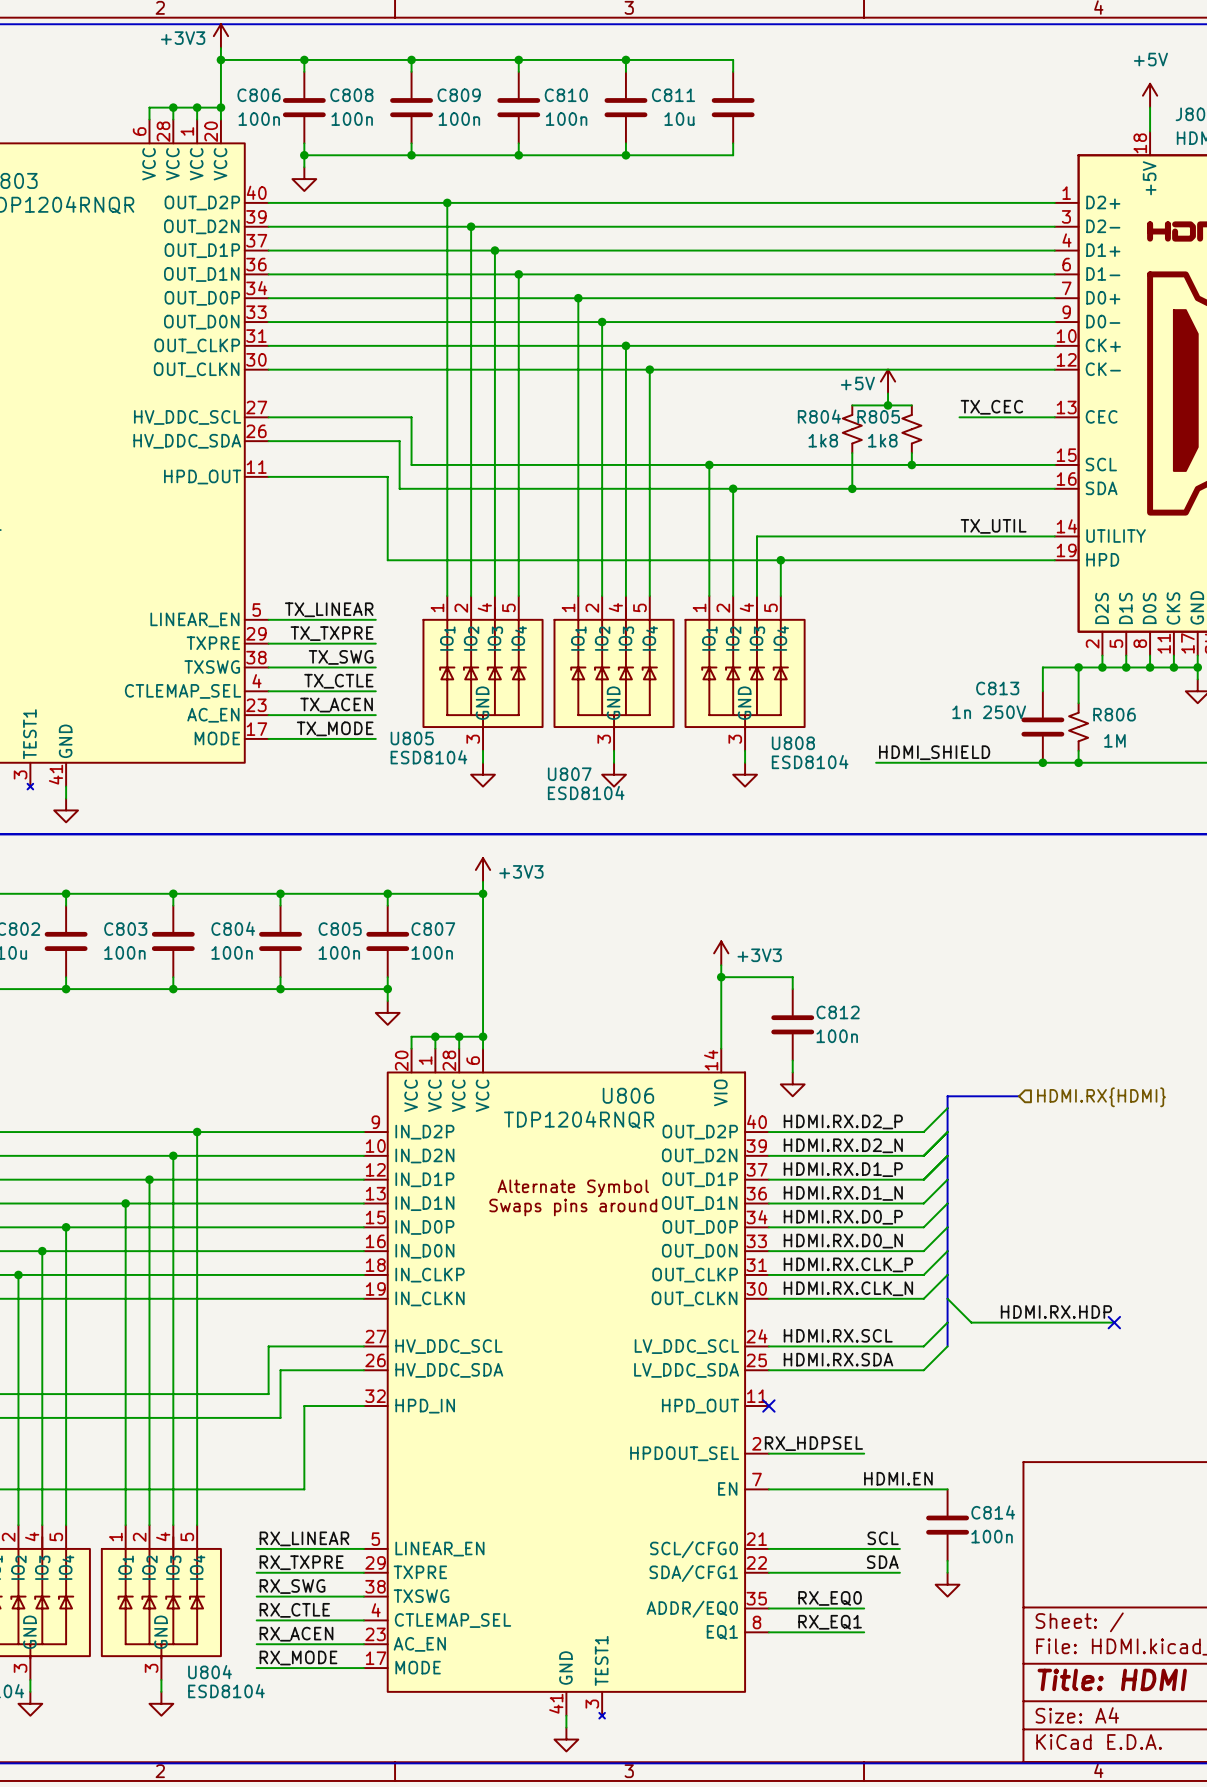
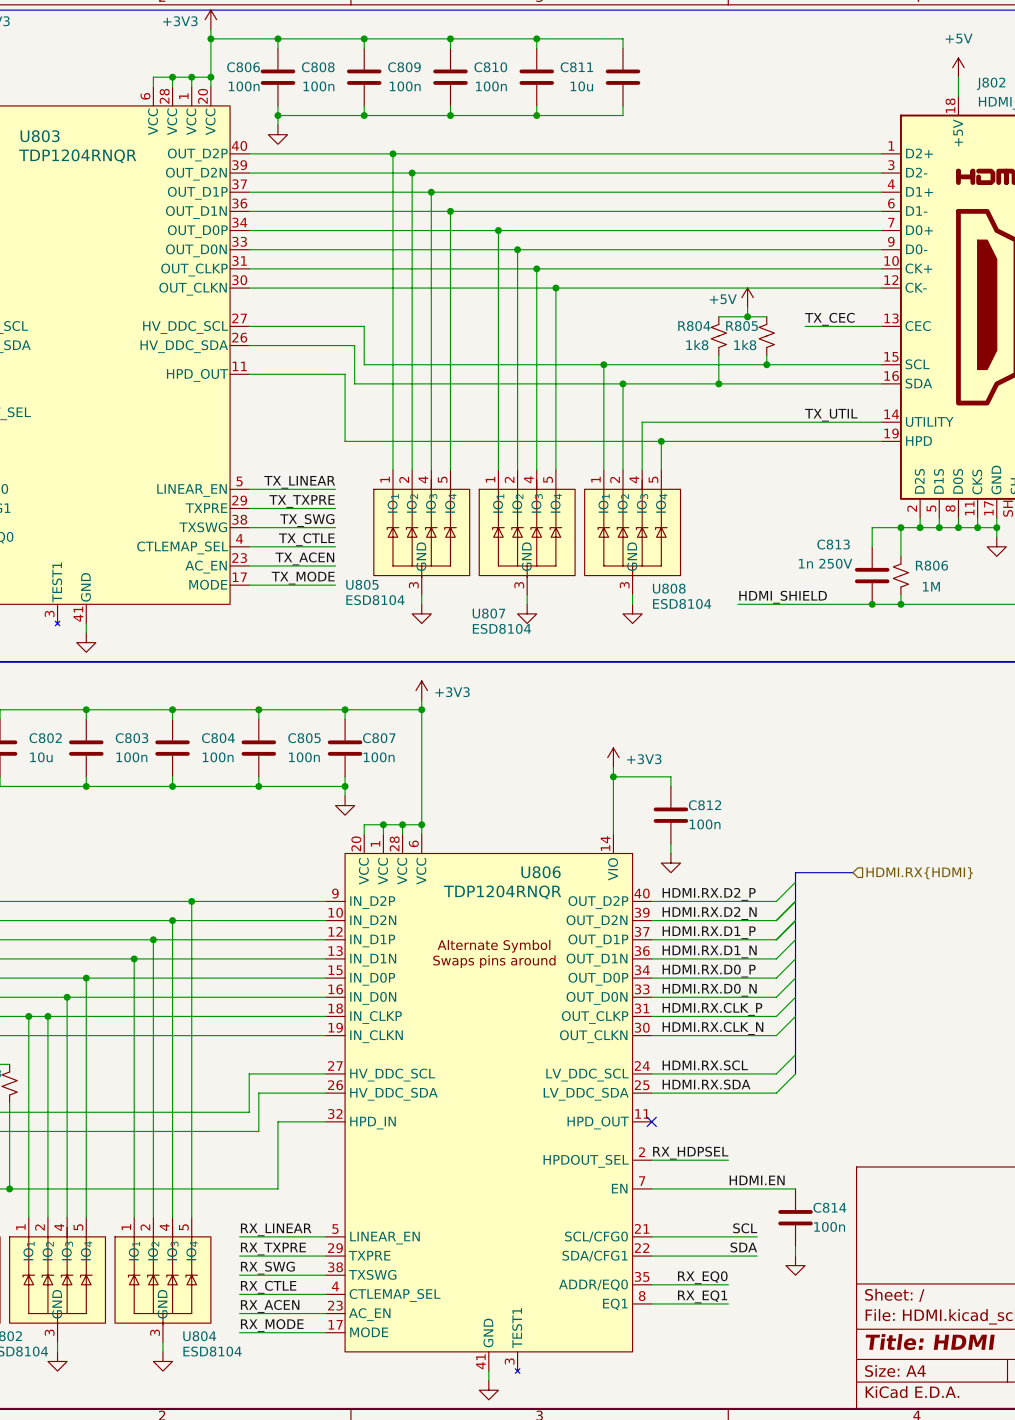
wire: (947, 1298) (971, 1322) (1114, 1322) -> none
label: HDMI.RX.HDP (1056, 1311) -> none
no-connect mark: (1114, 1322) -> none

